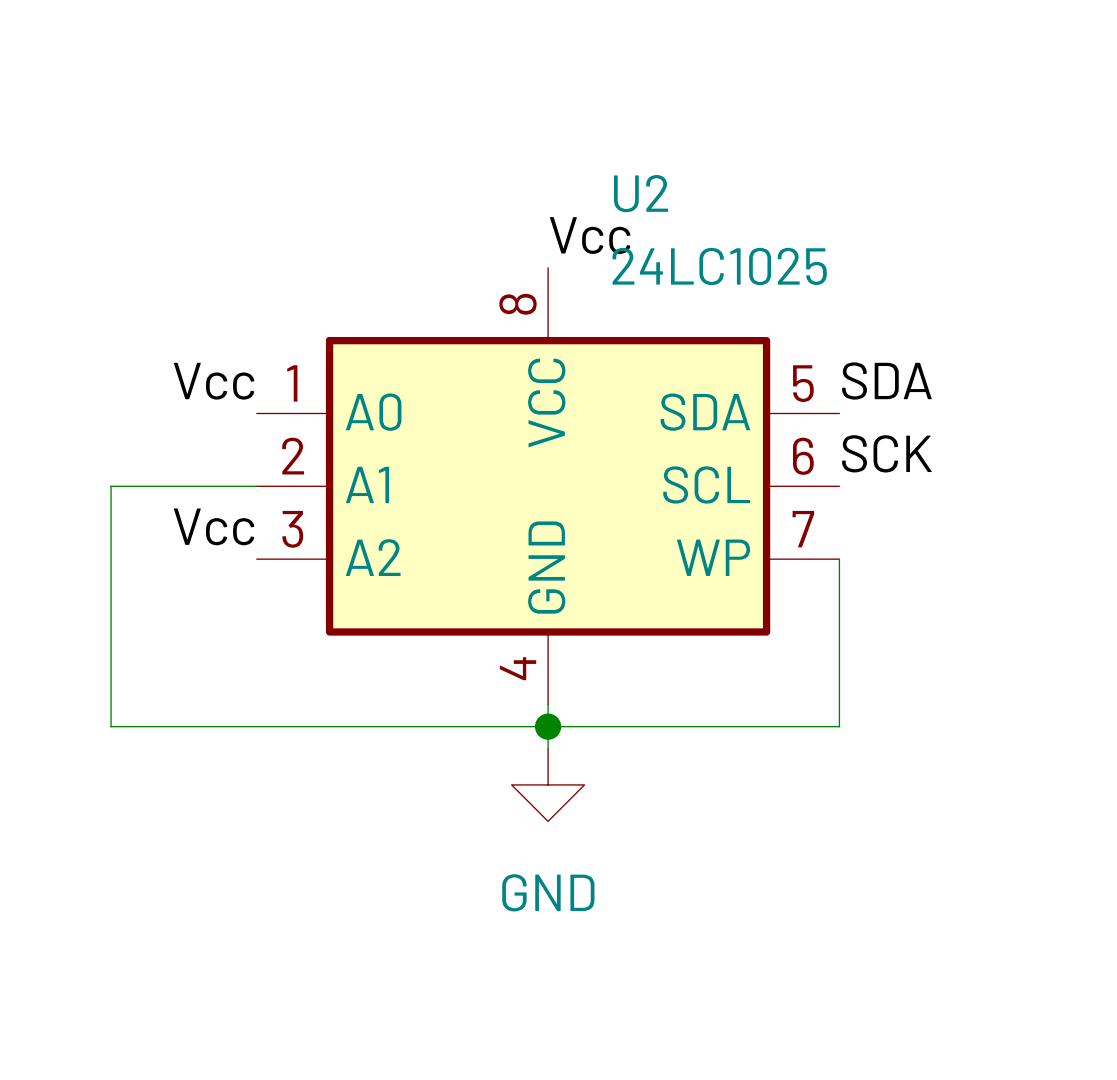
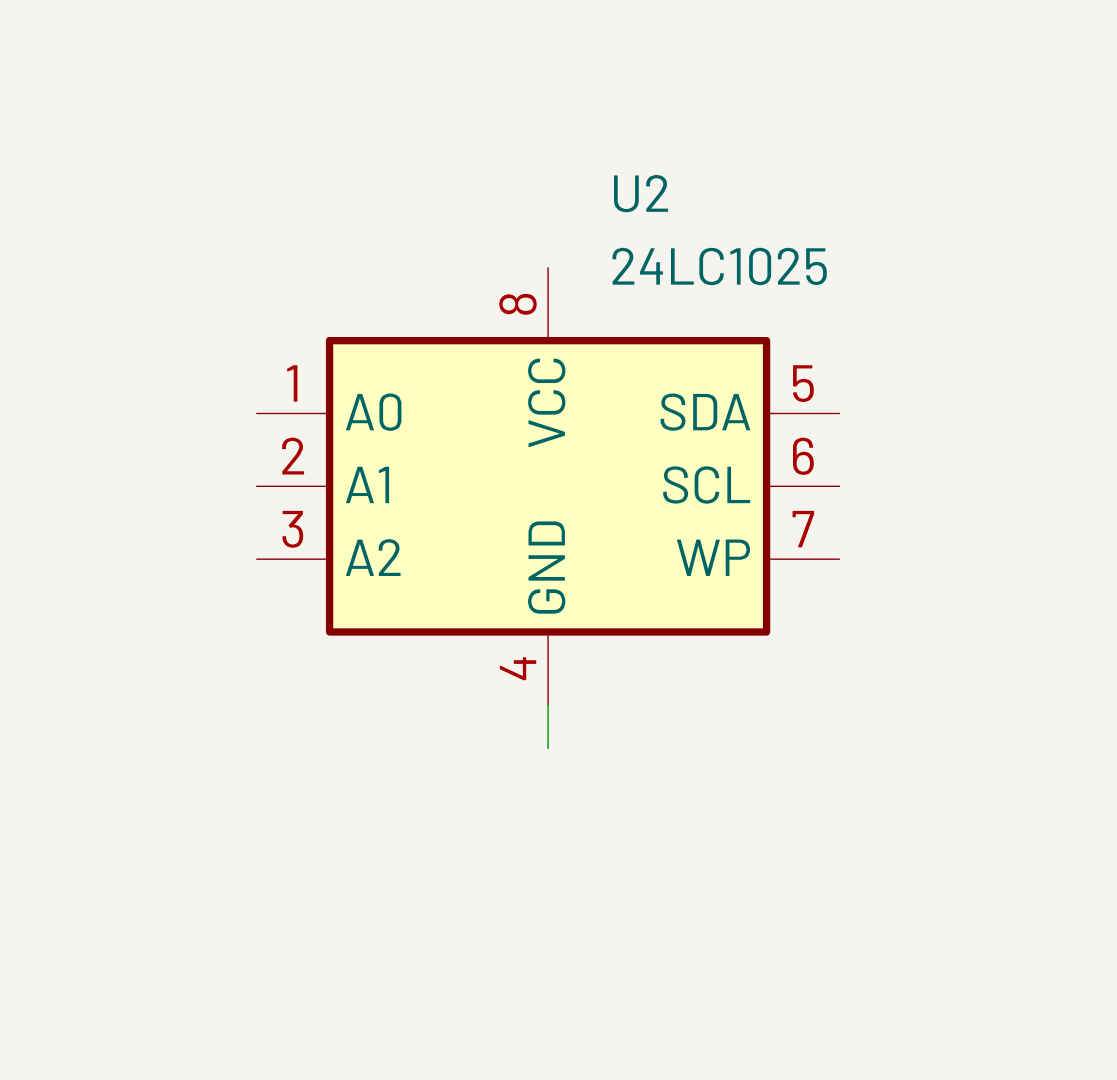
label: Vcc (590, 235) -> none
label: SDA (886, 380) -> none
label: Vcc (214, 381) -> none
label: SCK (886, 453) -> none
wire: (256, 486) (111, 486) (111, 726) (839, 726) (839, 559) -> none
label: Vcc (214, 526) -> none
junction: (548, 726) -> none
power symbol: GND (548, 784) -> none

